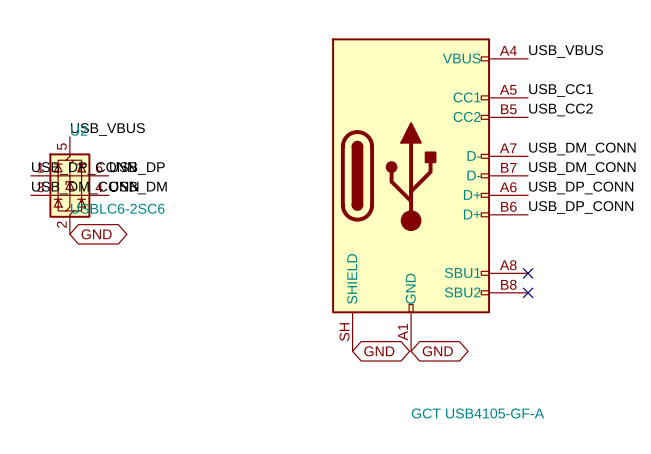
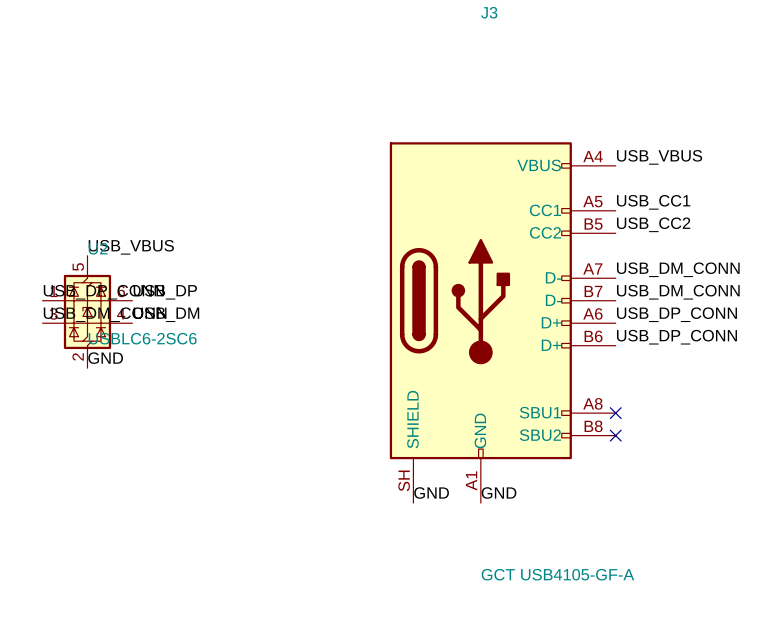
label: none -> GND (105, 358)
global label: GND (96, 234) -> none
label: none -> GND (431, 493)
label: none -> GND (499, 493)
global label: GND (379, 351) -> none
global label: GND (437, 351) -> none

